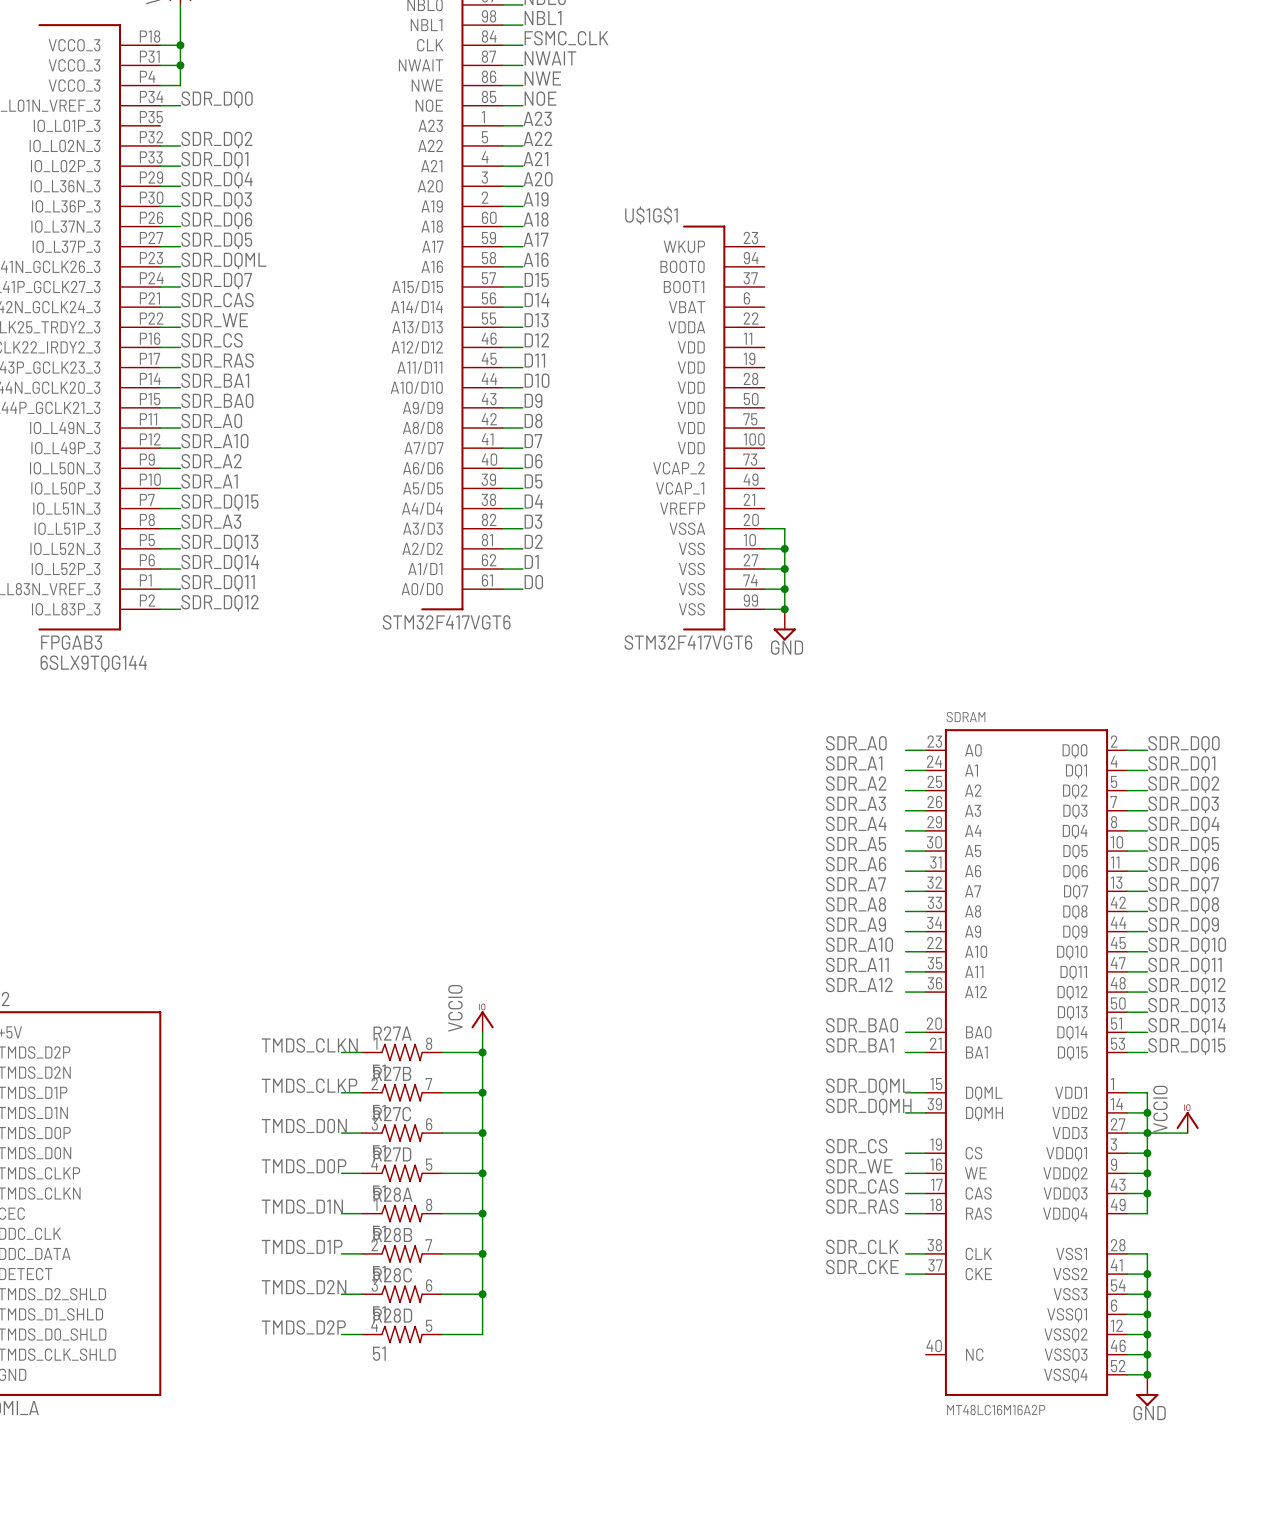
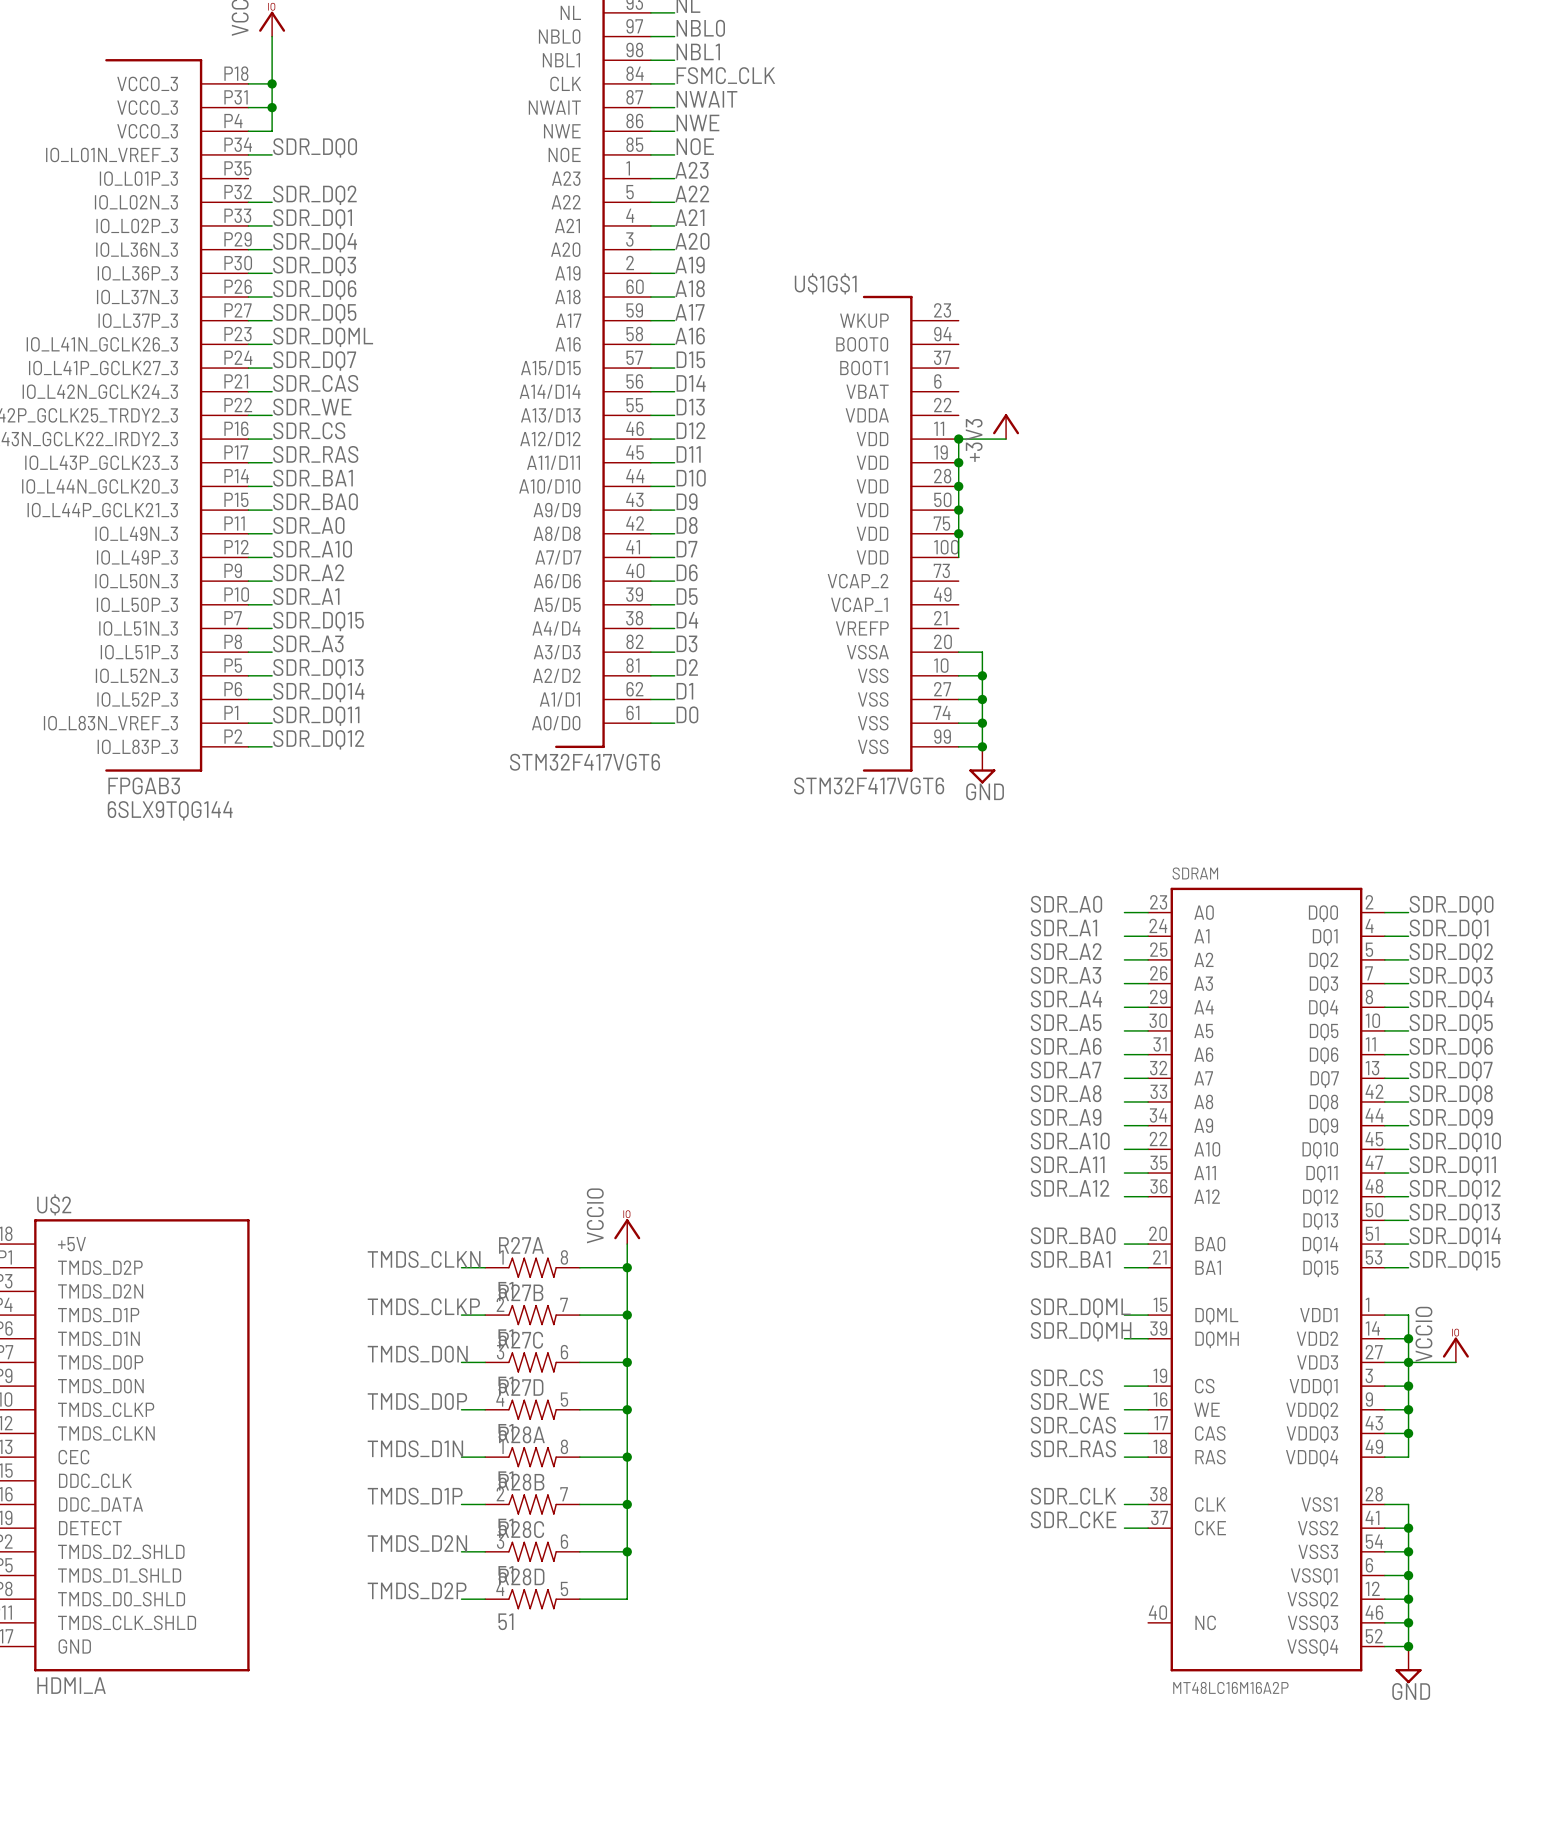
power symbol: none -> +3V3 (1006, 426)
junction: none -> (958, 439)
wire: none -> (1006, 439) (958, 439) (958, 557)
junction: none -> (958, 462)
junction: none -> (958, 486)
junction: none -> (958, 510)
junction: none -> (958, 533)

